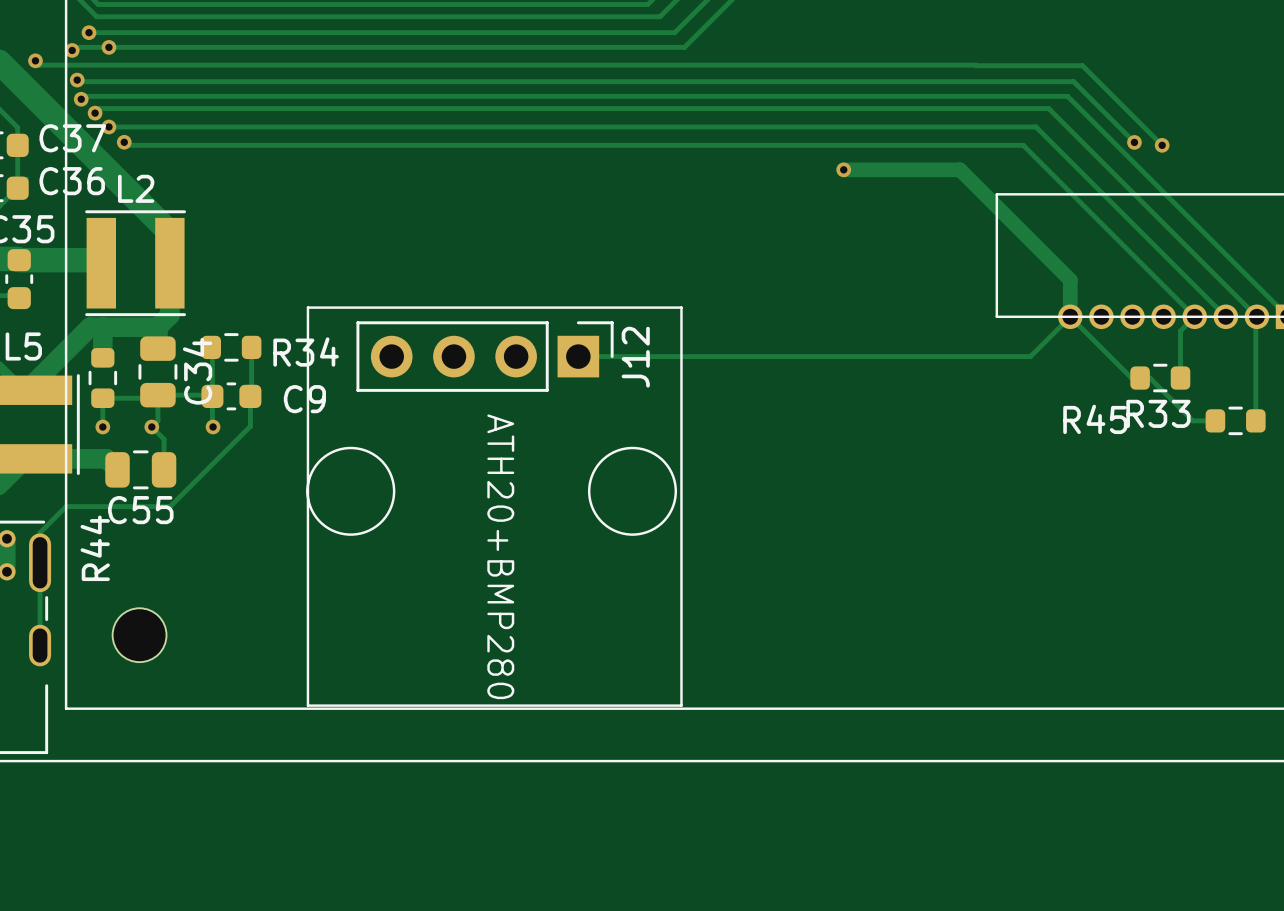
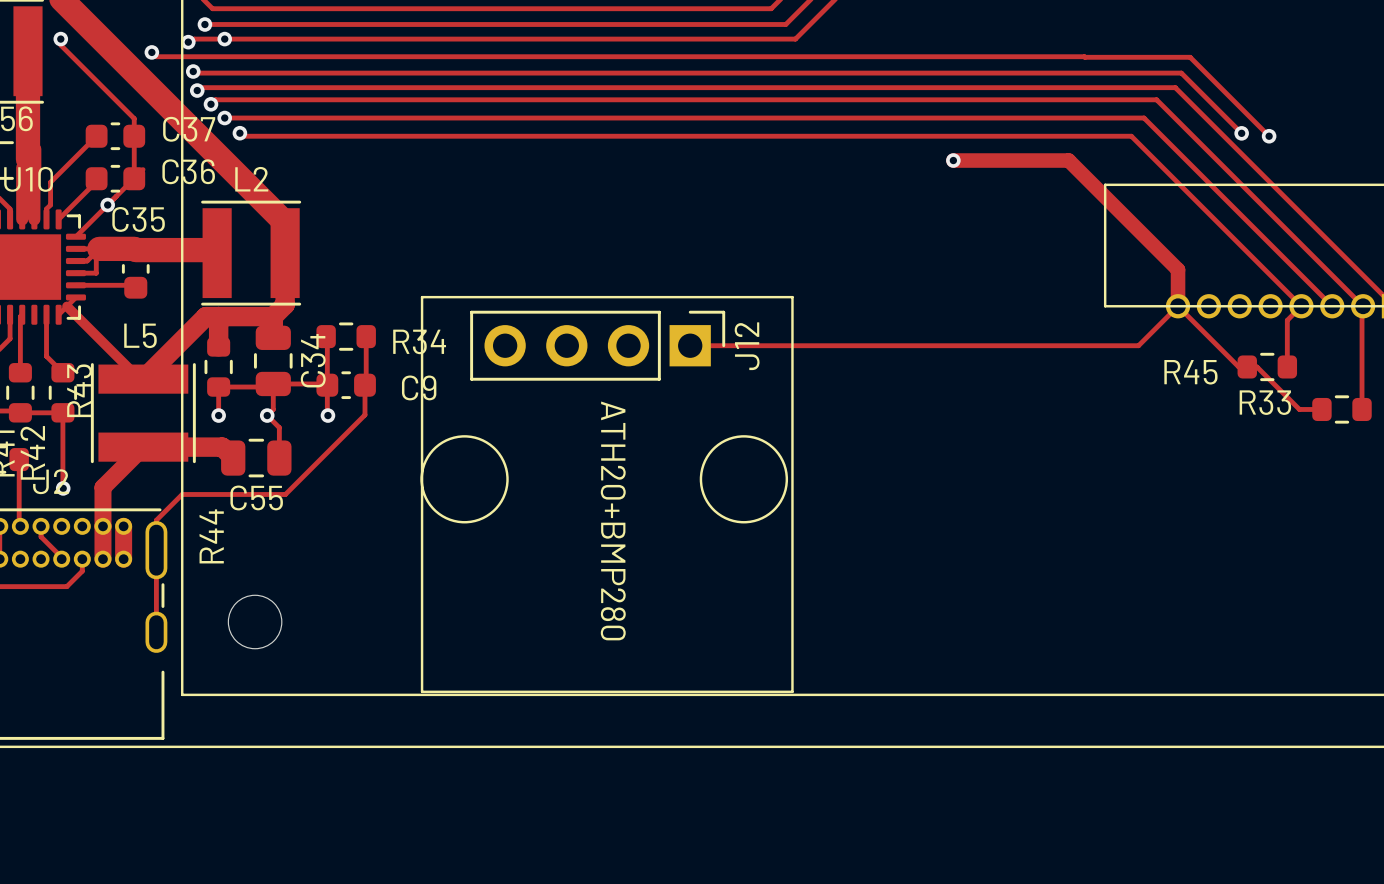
R45 name position: R45 (1095, 419) -> R45 (1190, 372)

